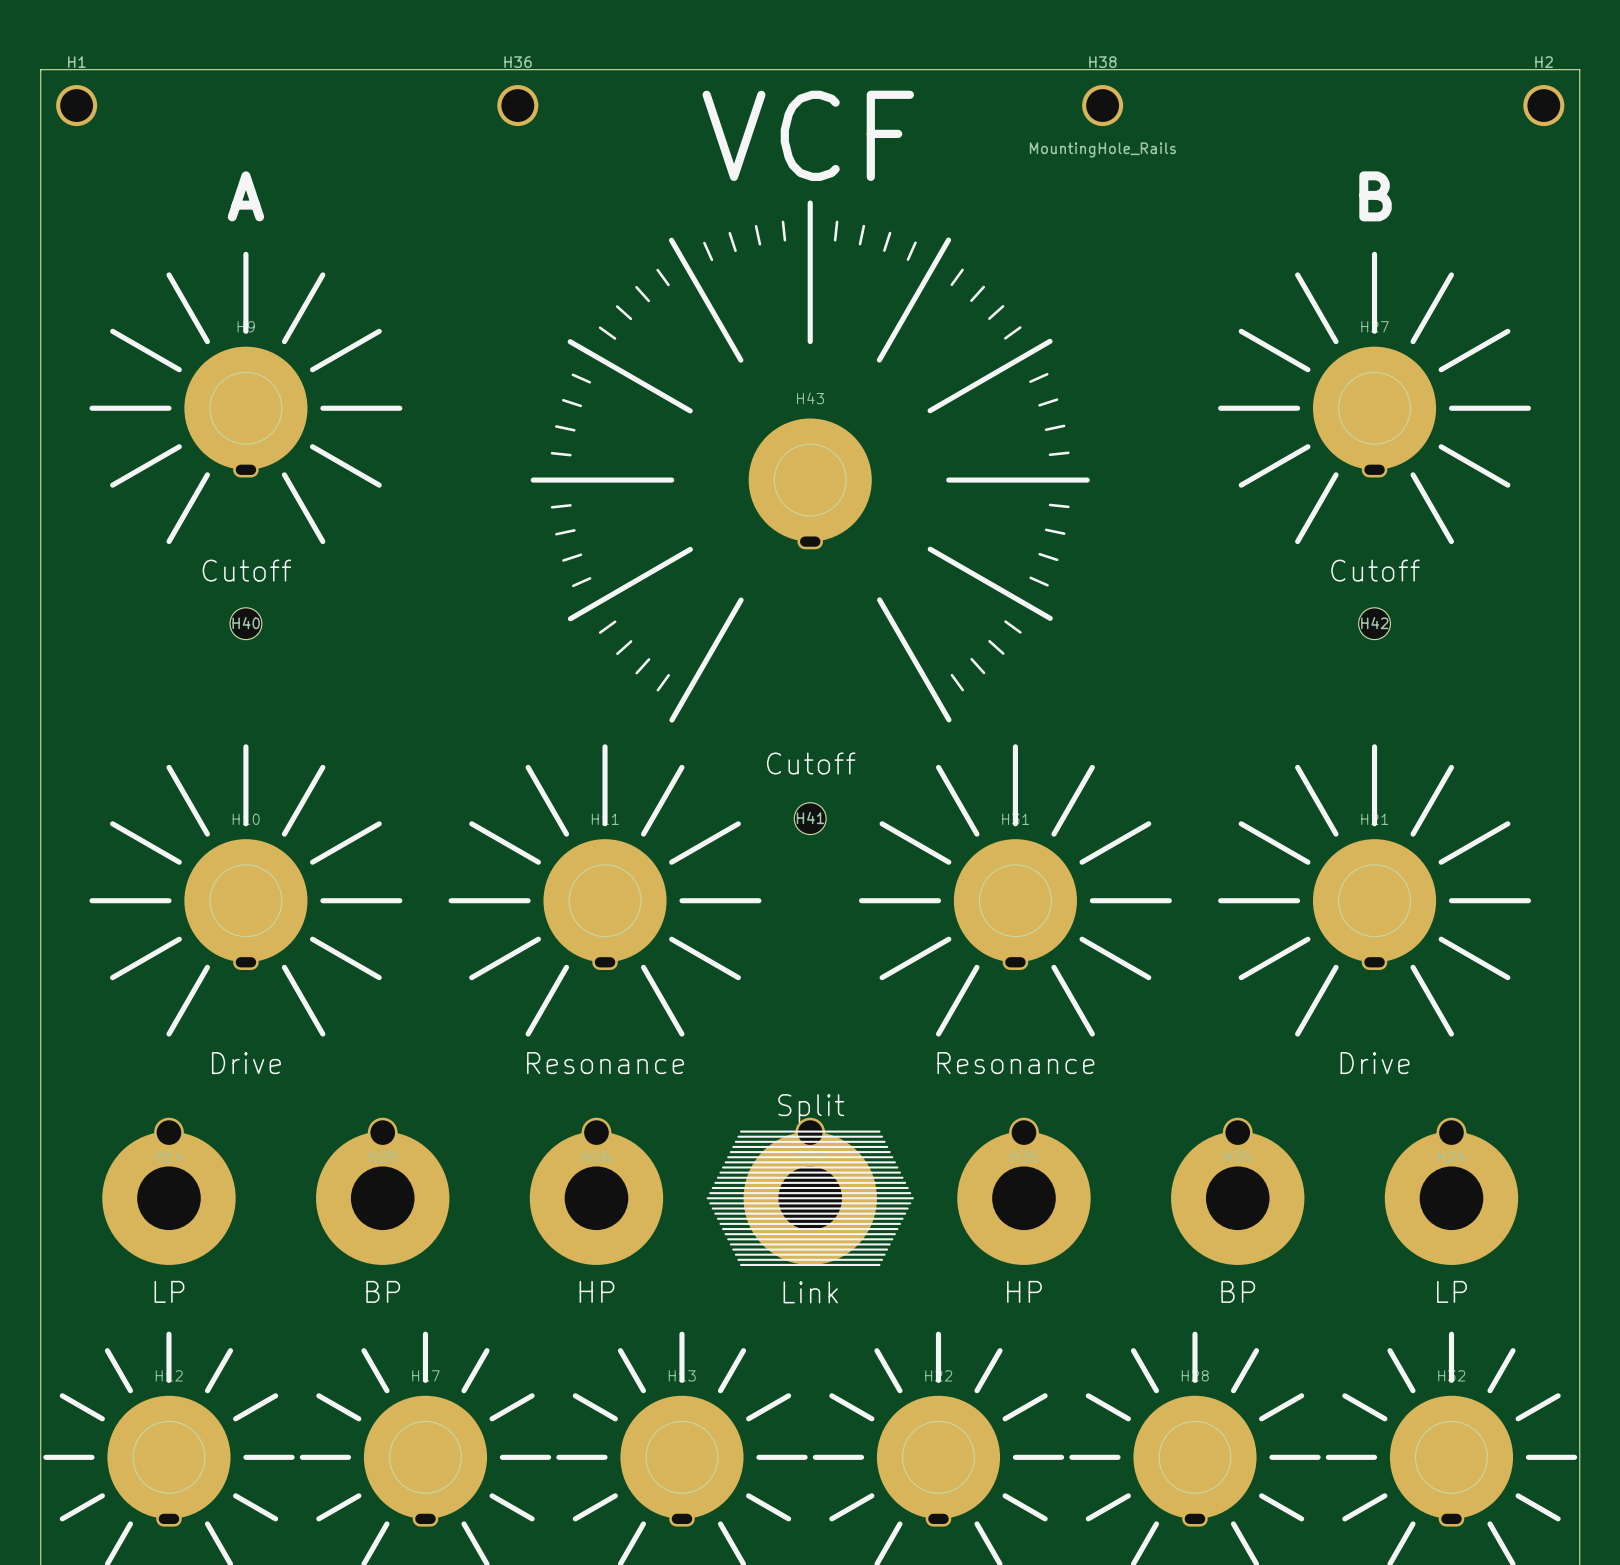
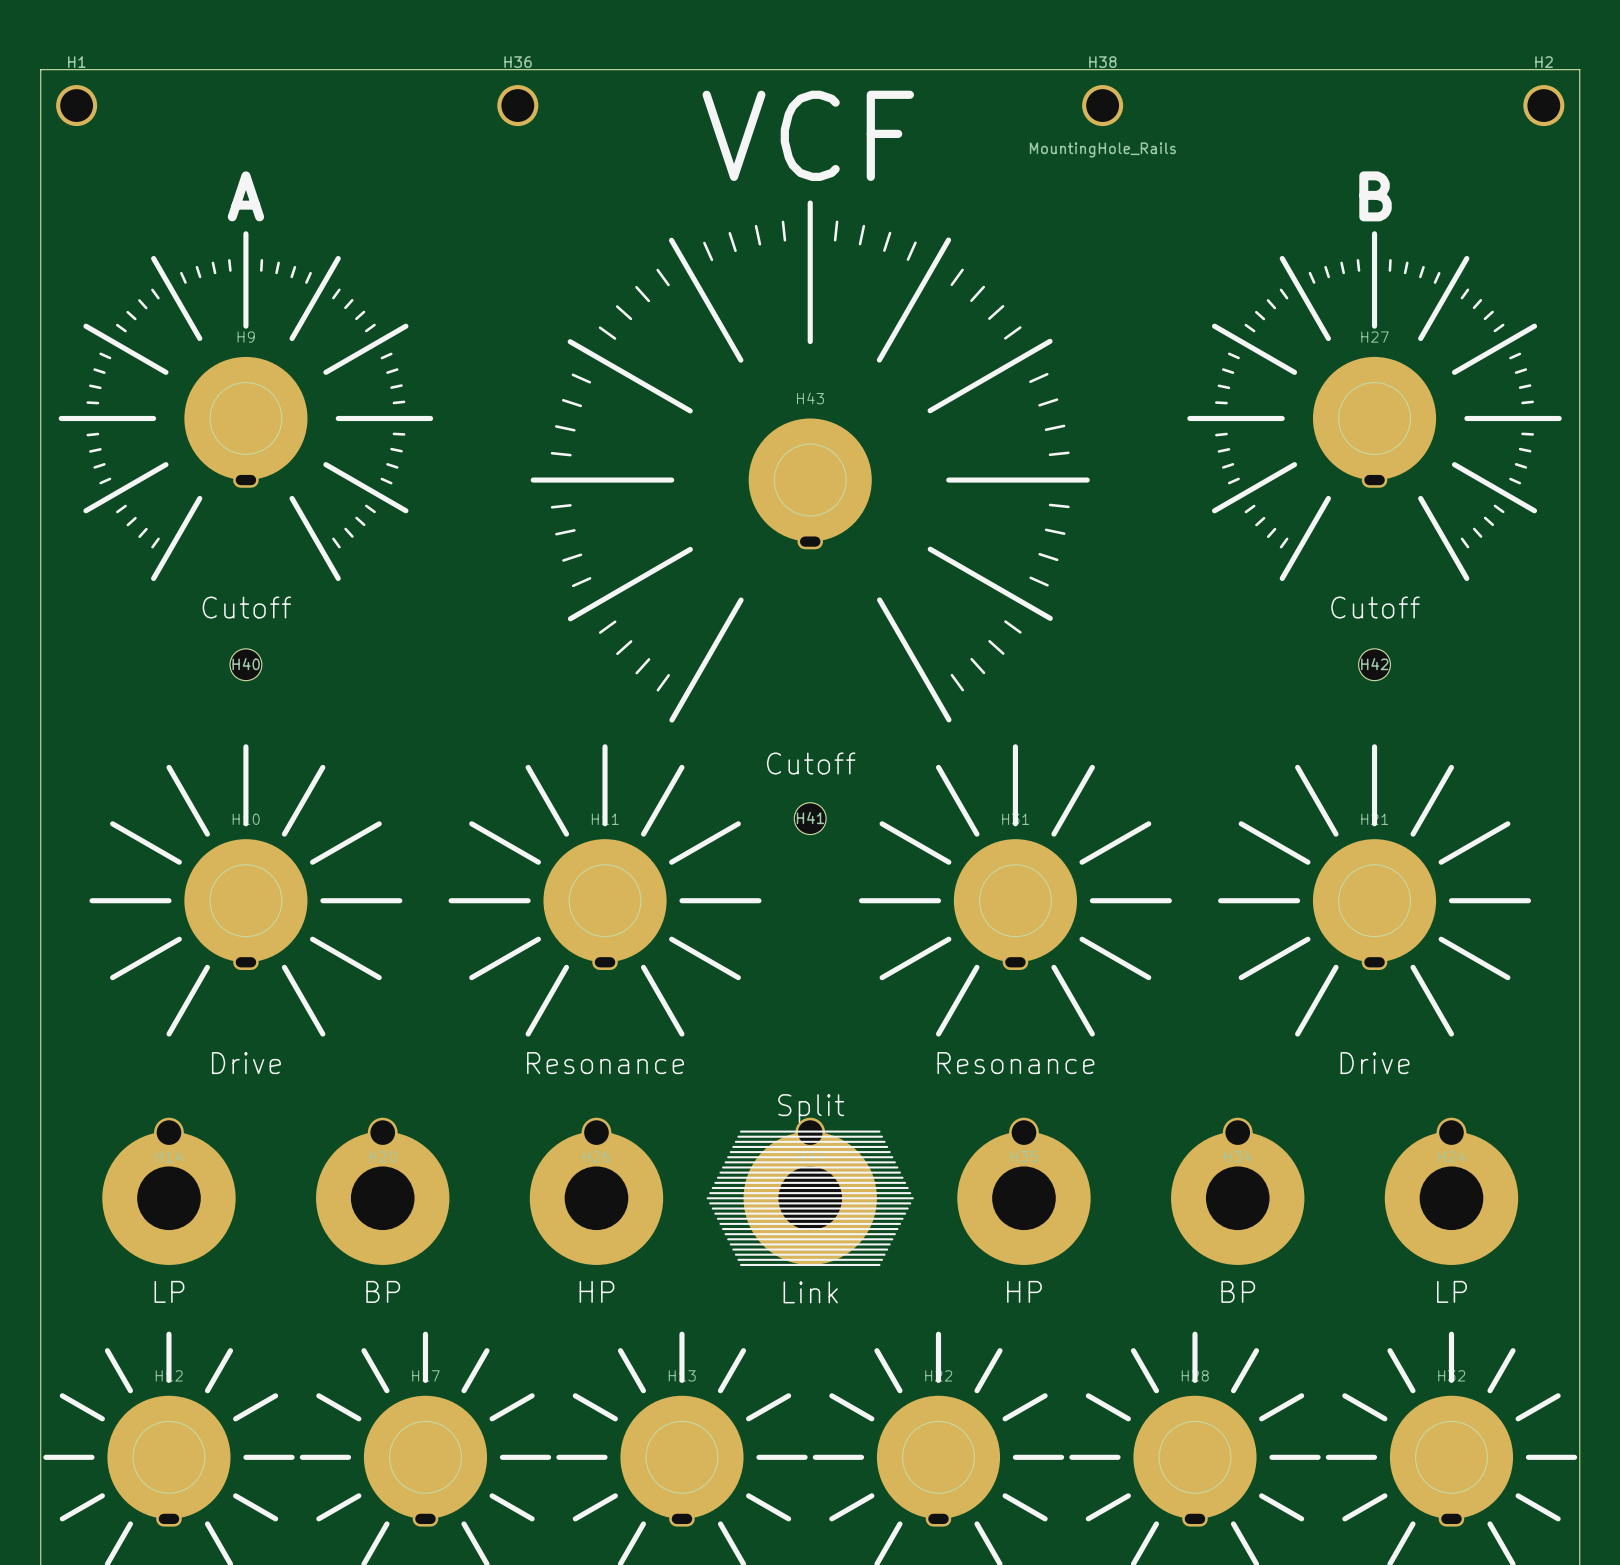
H9 footprint: [89, 251, 403, 545] -> [58, 231, 434, 582]
H27 footprint: [1218, 251, 1532, 545] -> [1187, 231, 1562, 582]
H9 value position: Cutoff (246, 570) -> Cutoff (246, 607)
H27 value position: Cutoff (1375, 570) -> Cutoff (1375, 607)
H40 position: (245, 623) -> (245, 664)
H42 position: (1374, 623) -> (1374, 664)

